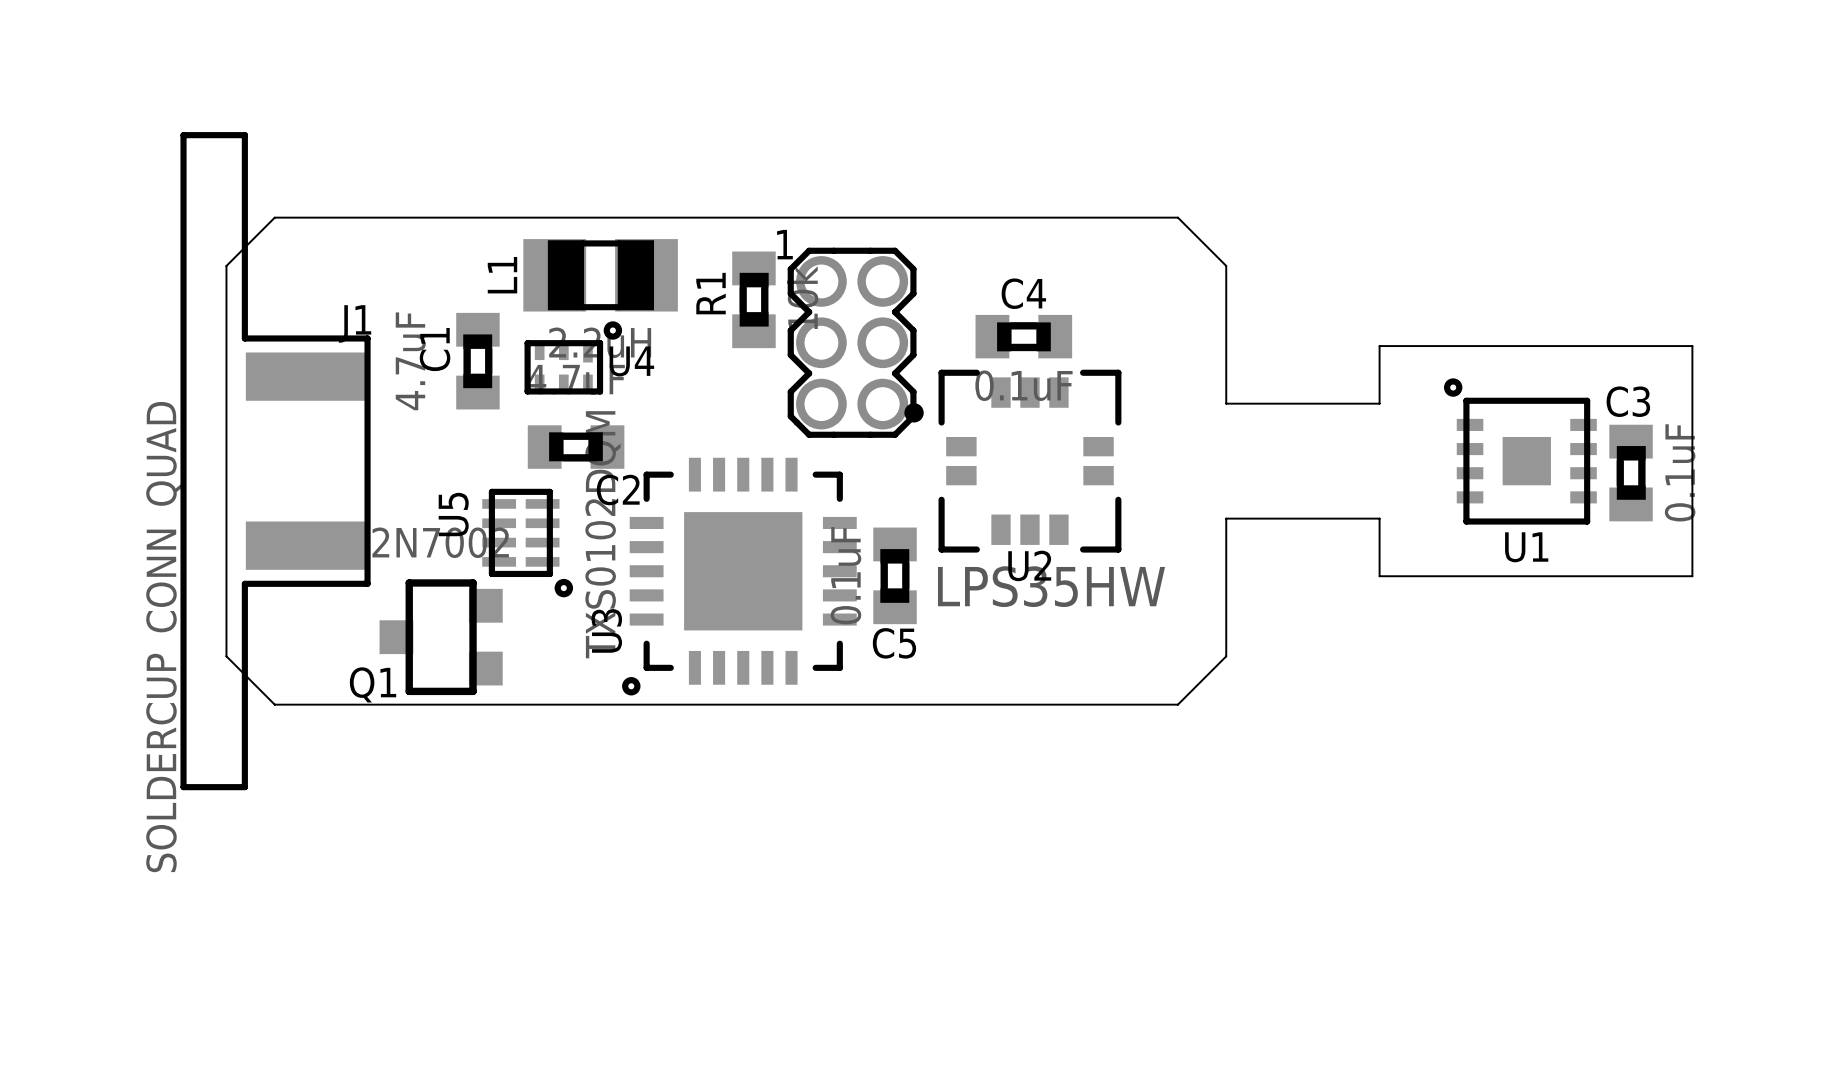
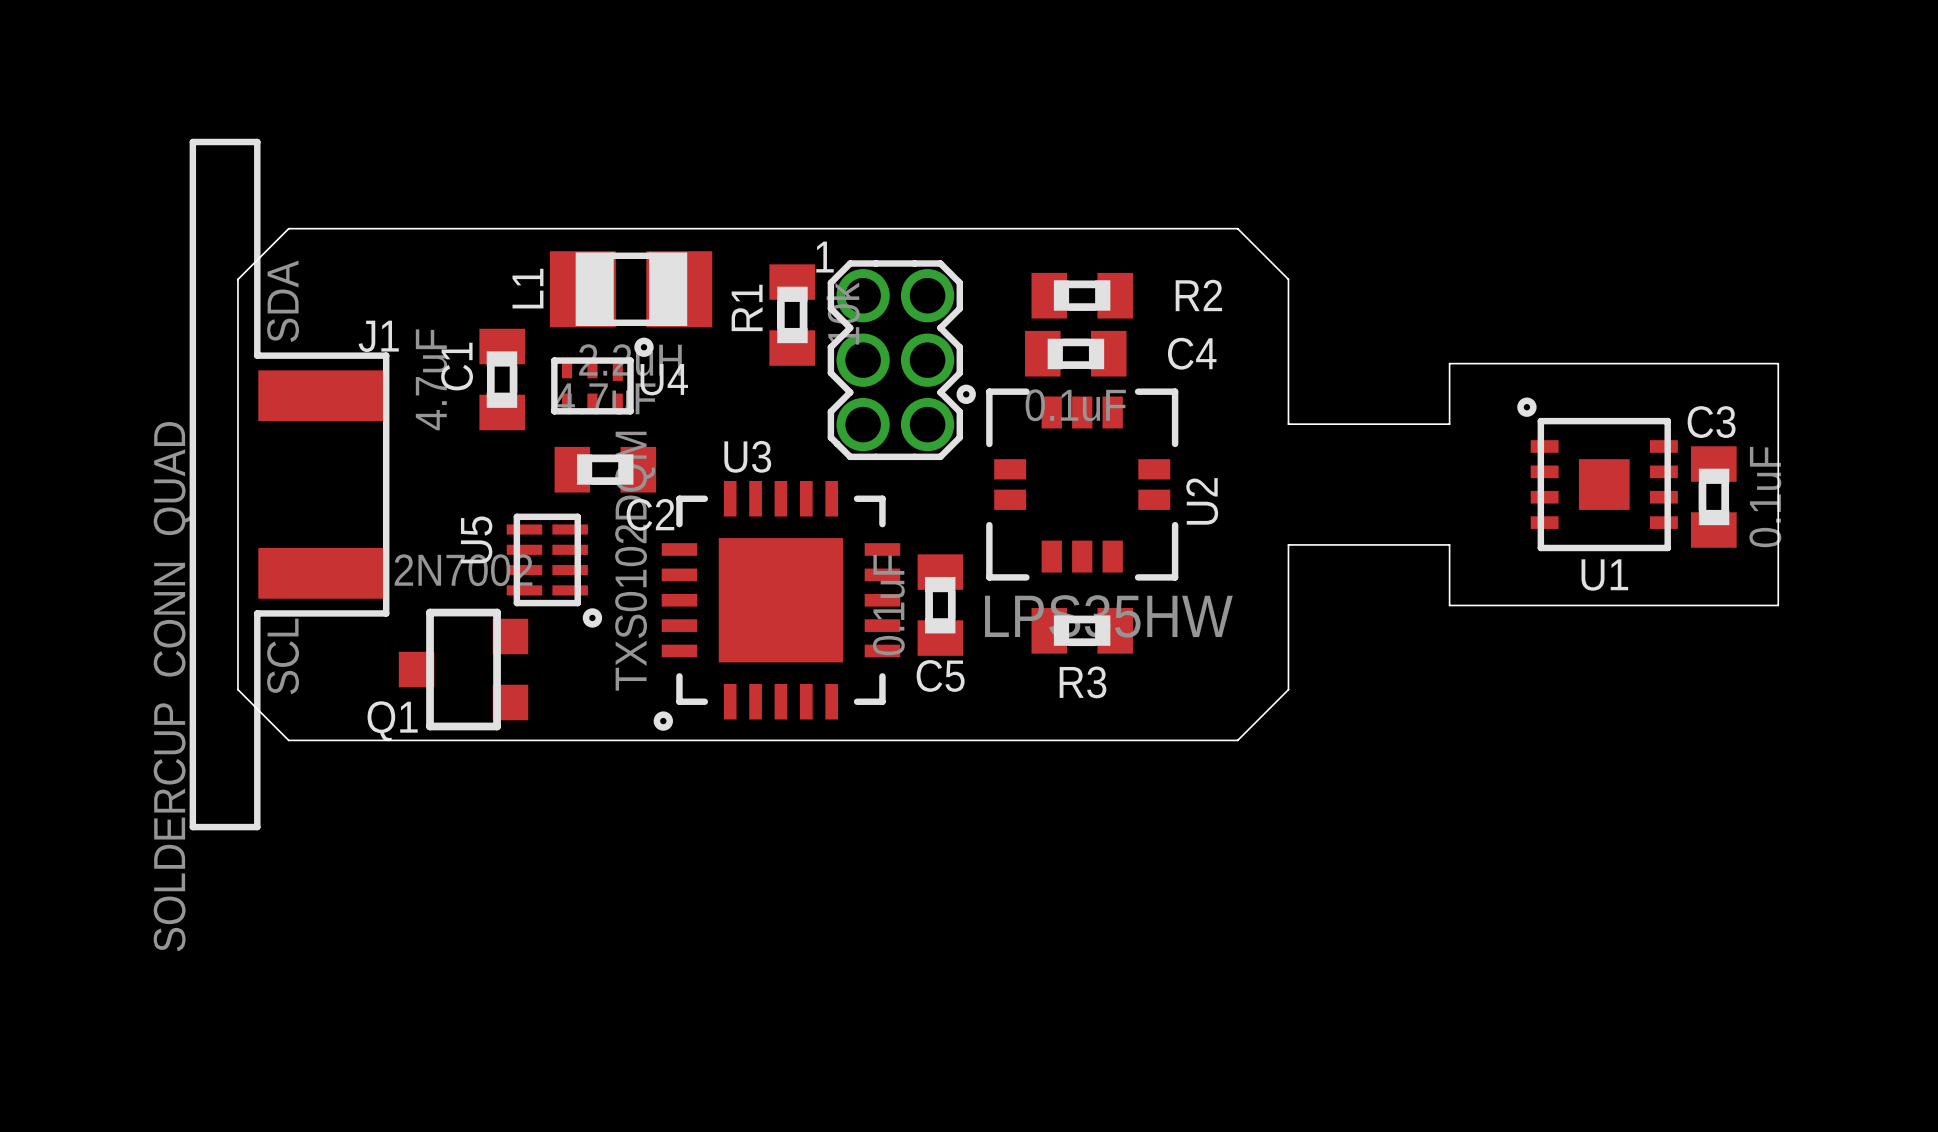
R2: none -> (1082, 295)
text: none -> SDA (283, 301)
C4 name position: C4 (1023, 293) -> C4 (1192, 353)
U2 footprint: [904, 369, 1122, 553] -> [956, 384, 1179, 581]
U2 name rotation: 0° (1029, 565) -> 90° counterclockwise (1202, 501)
U2 name position: U2 (1029, 565) -> U2 (1202, 501)
R3: none -> (1082, 630)
text: none -> SCL (283, 656)
U3 name rotation: 0° (606, 630) -> 90° clockwise (747, 456)
U3 name position: U3 (606, 630) -> U3 (747, 456)

